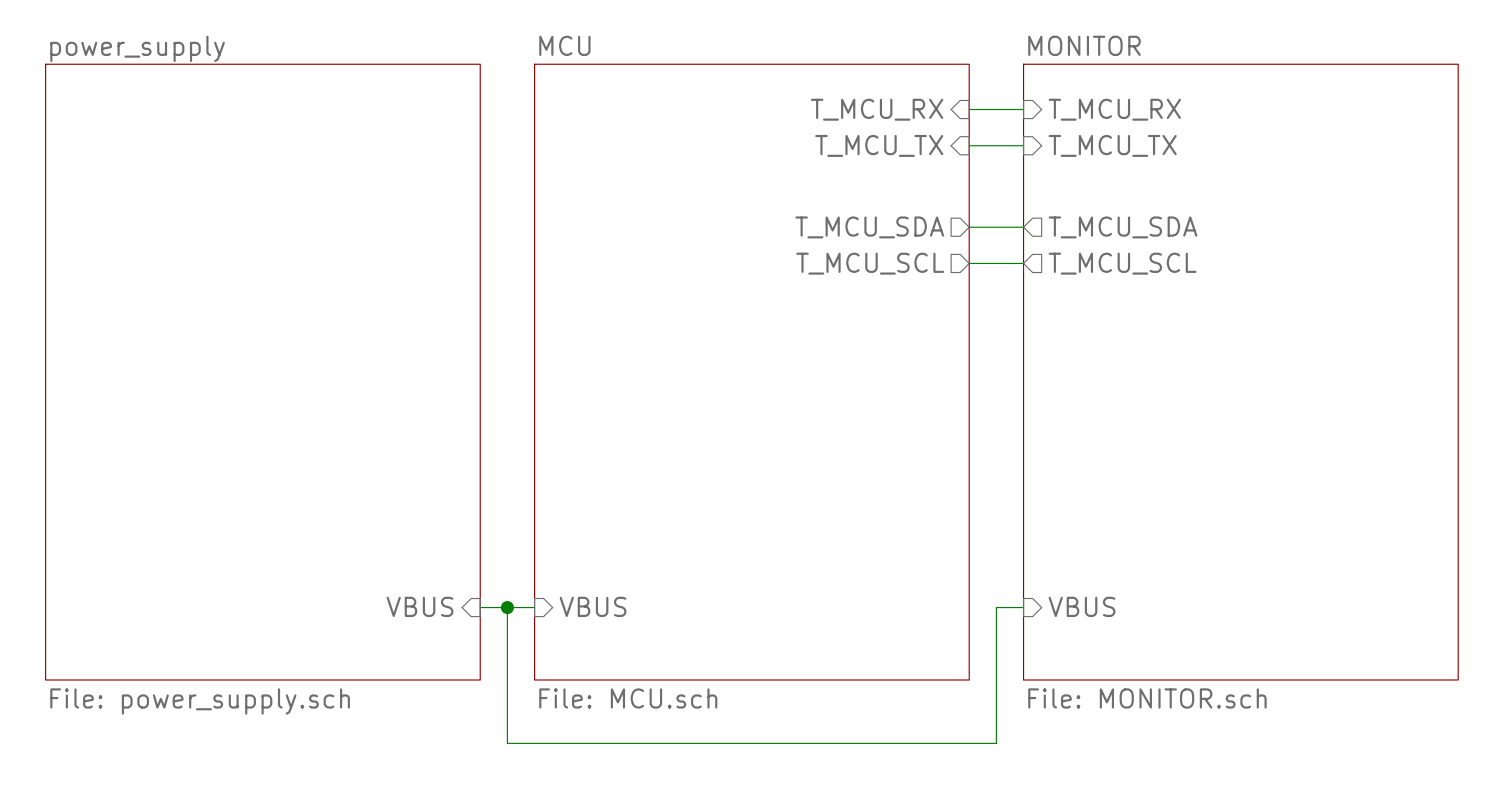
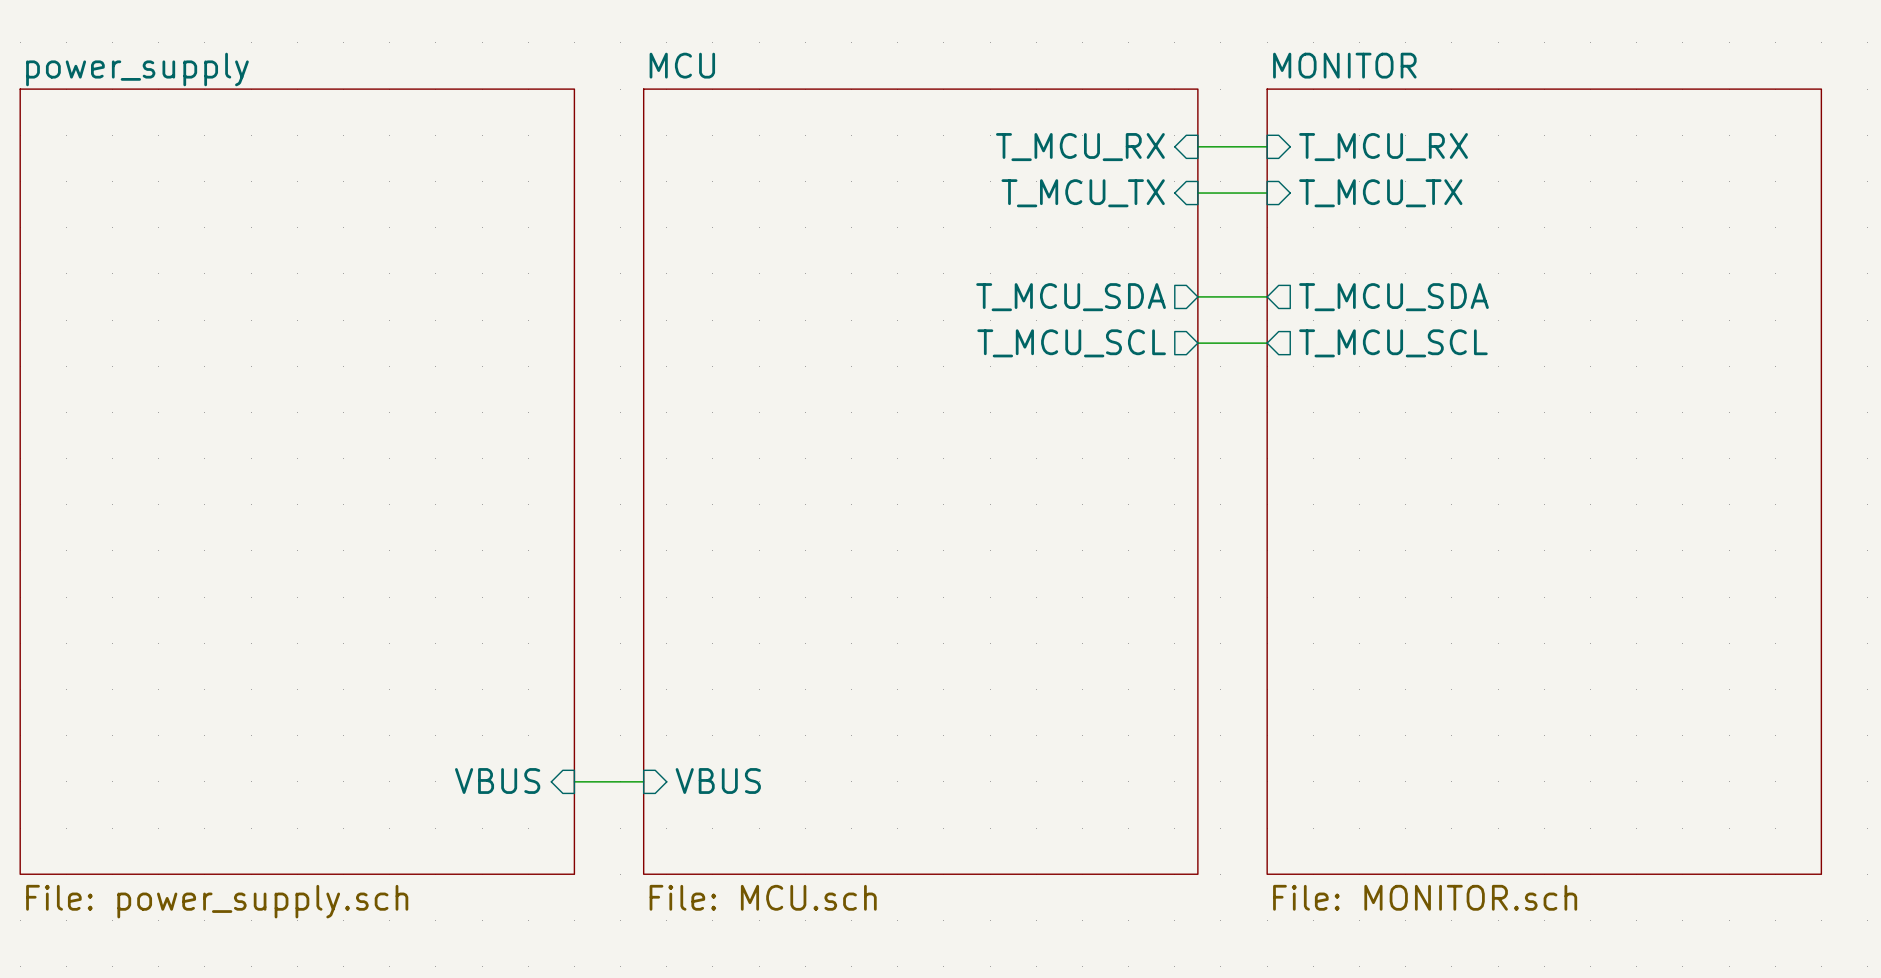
sheet pin: VBUS (1082, 606) -> none
wire: (507, 607) (507, 743) (996, 743) (996, 607) (1023, 607) -> none
junction: (507, 607) -> none

